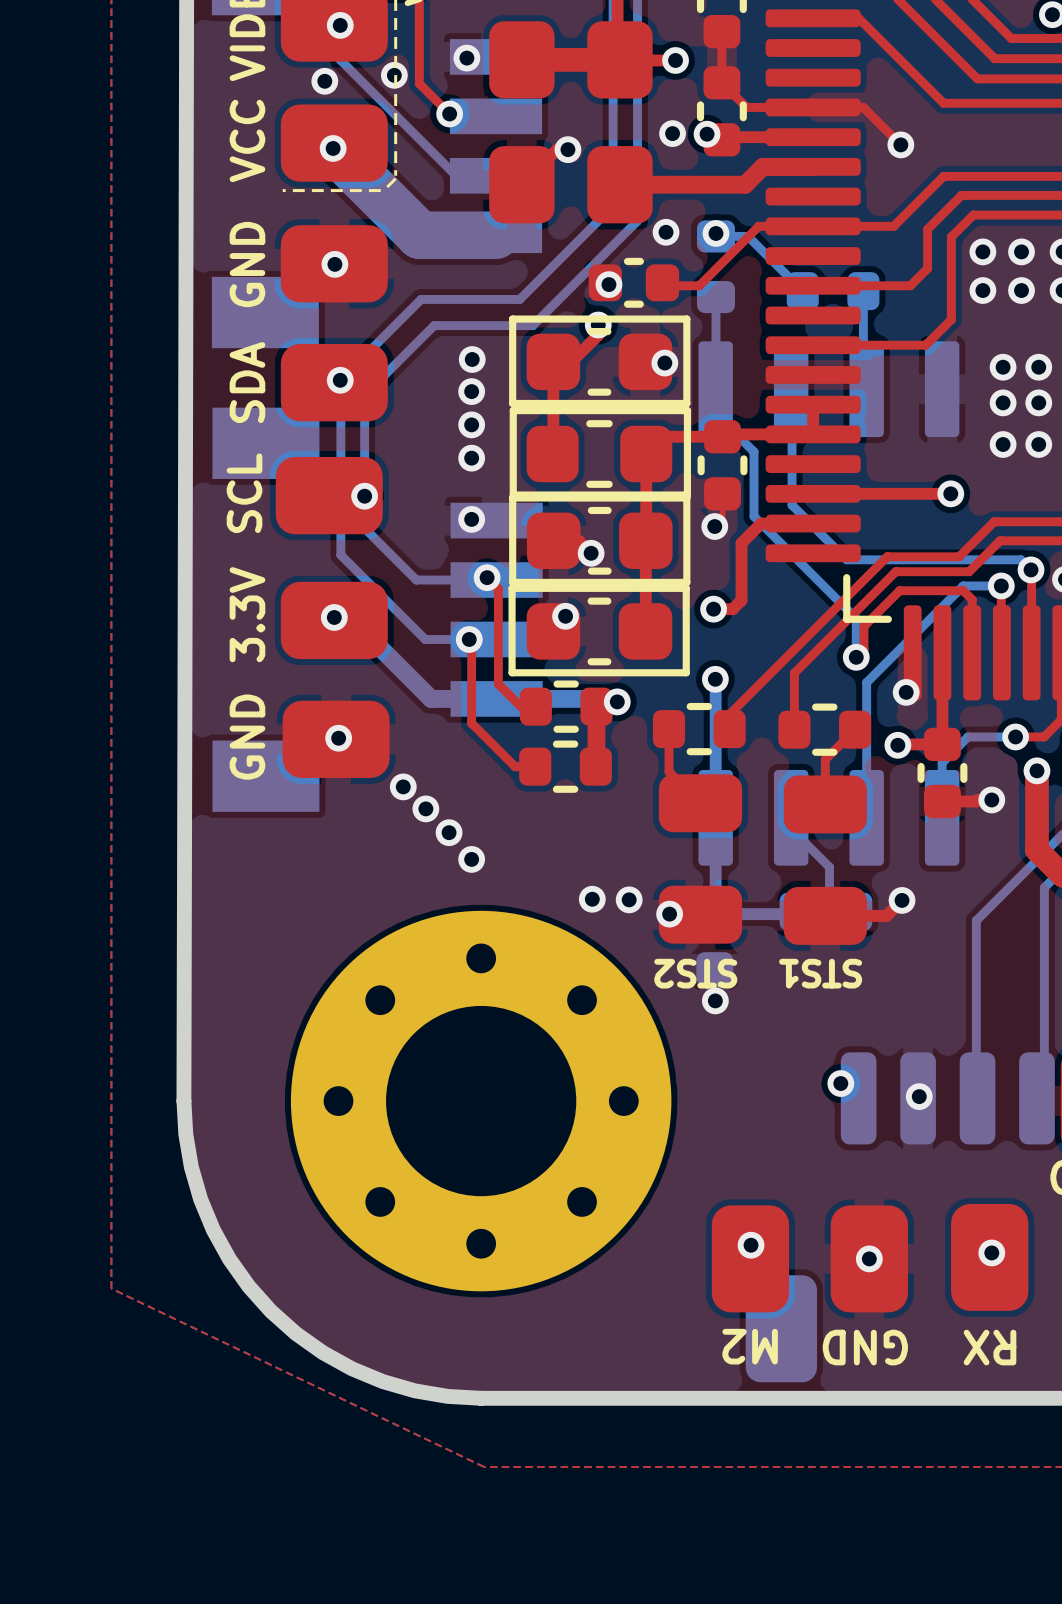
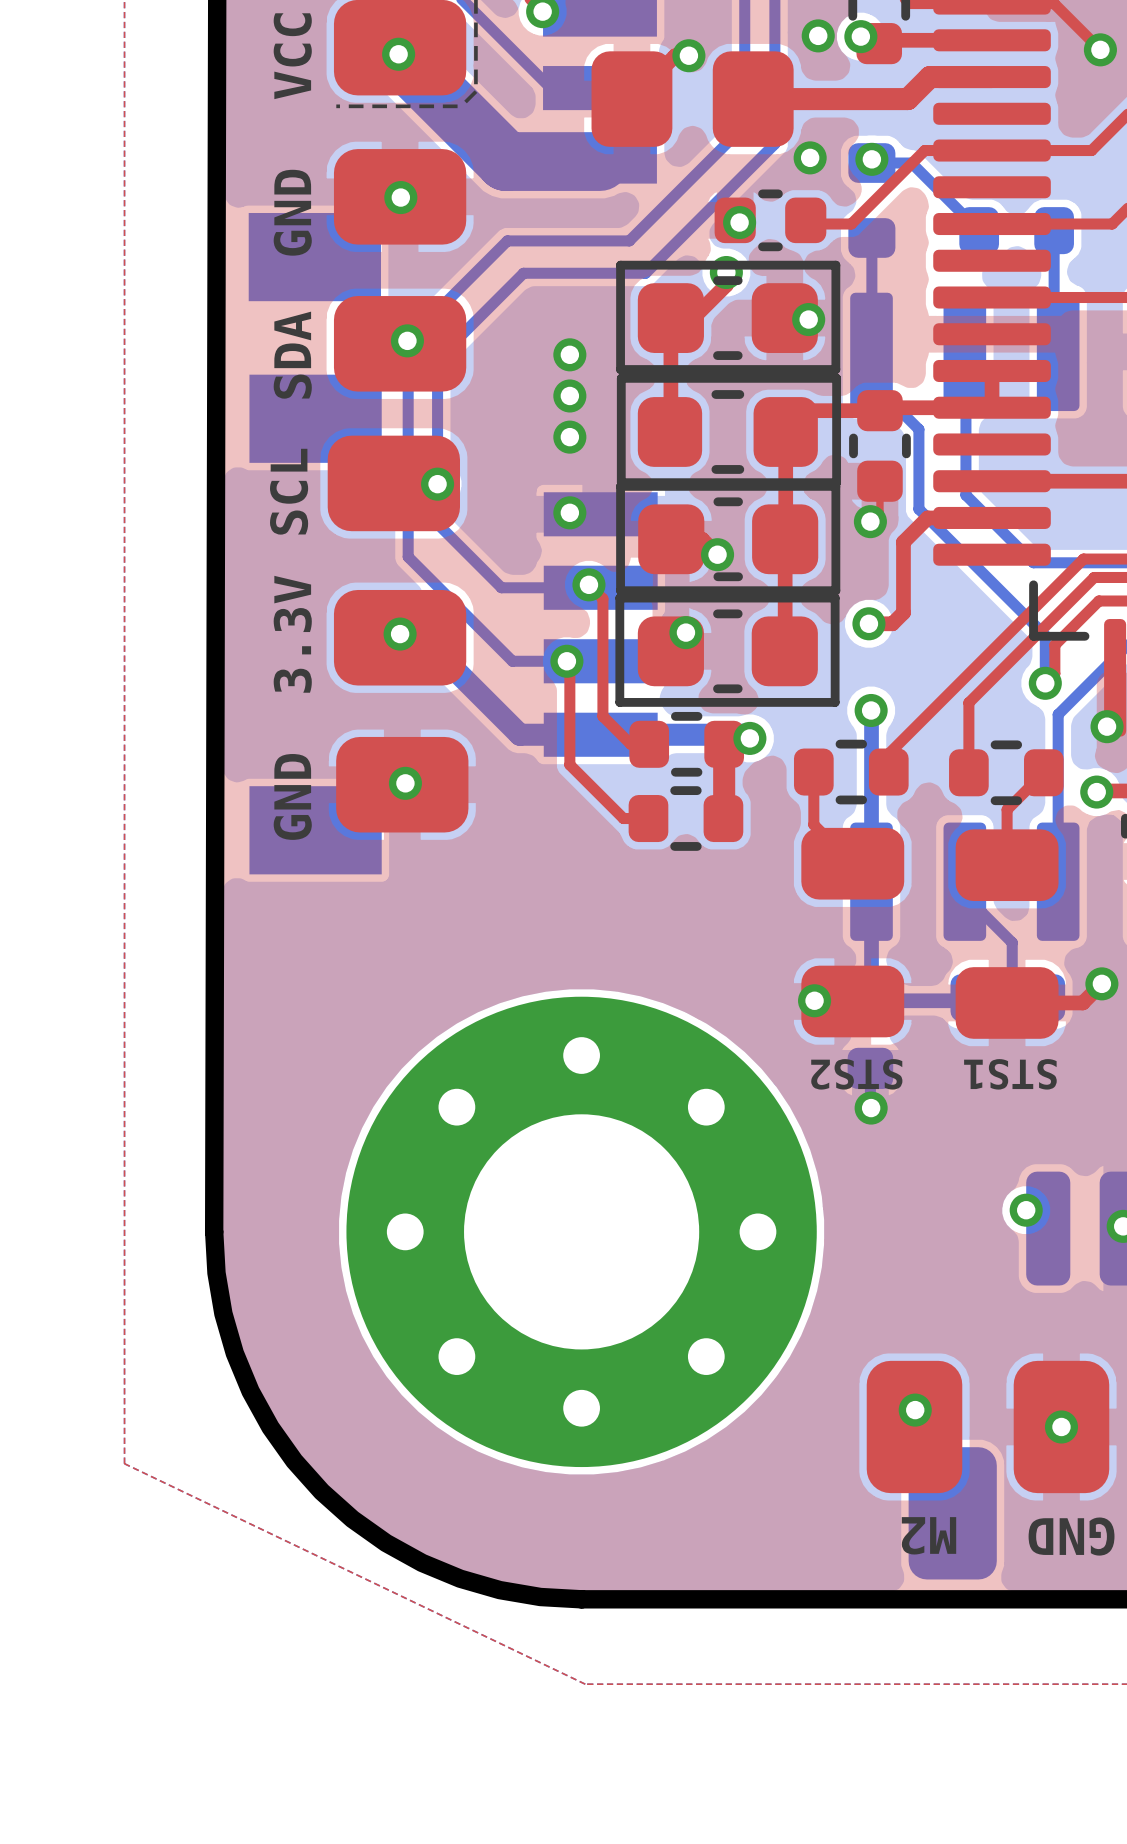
via: (472, 359) -> none
via: (403, 786) -> none
via: (425, 808) -> none
via: (449, 832) -> none
via: (471, 859) -> none
via: (592, 899) -> none
via: (629, 899) -> none

